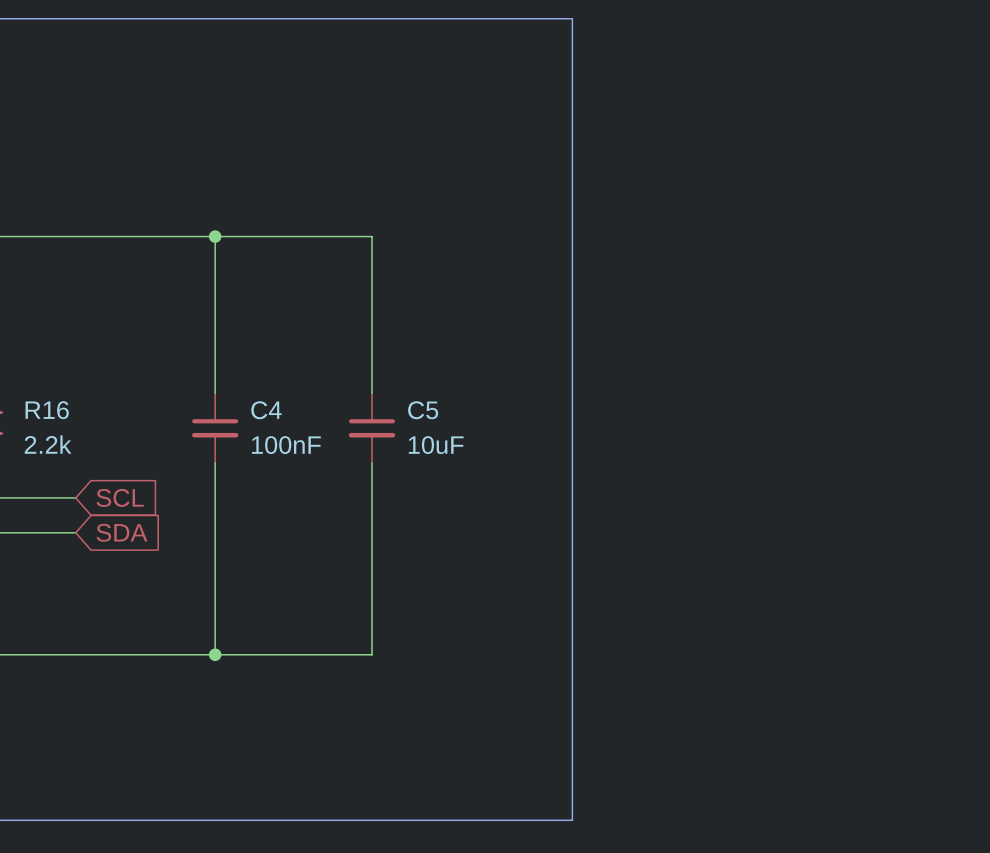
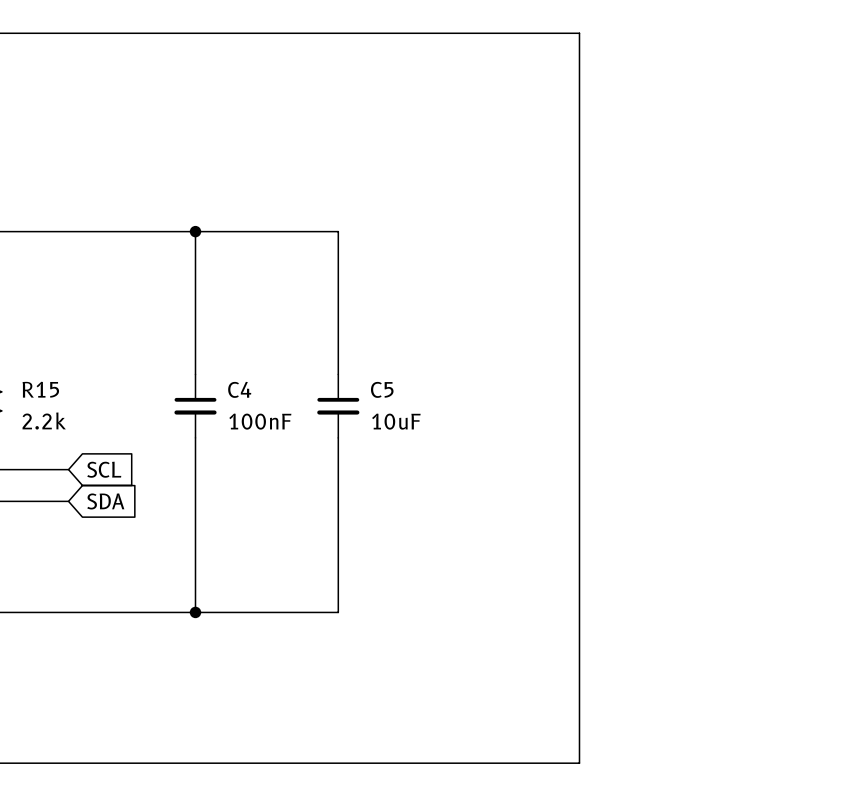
line: (572, 18) (572, 820) -> (520, 33) (579, 33) (579, 763) (520, 763)
R16 name: R16 (47, 410) -> R15 (40, 389)

